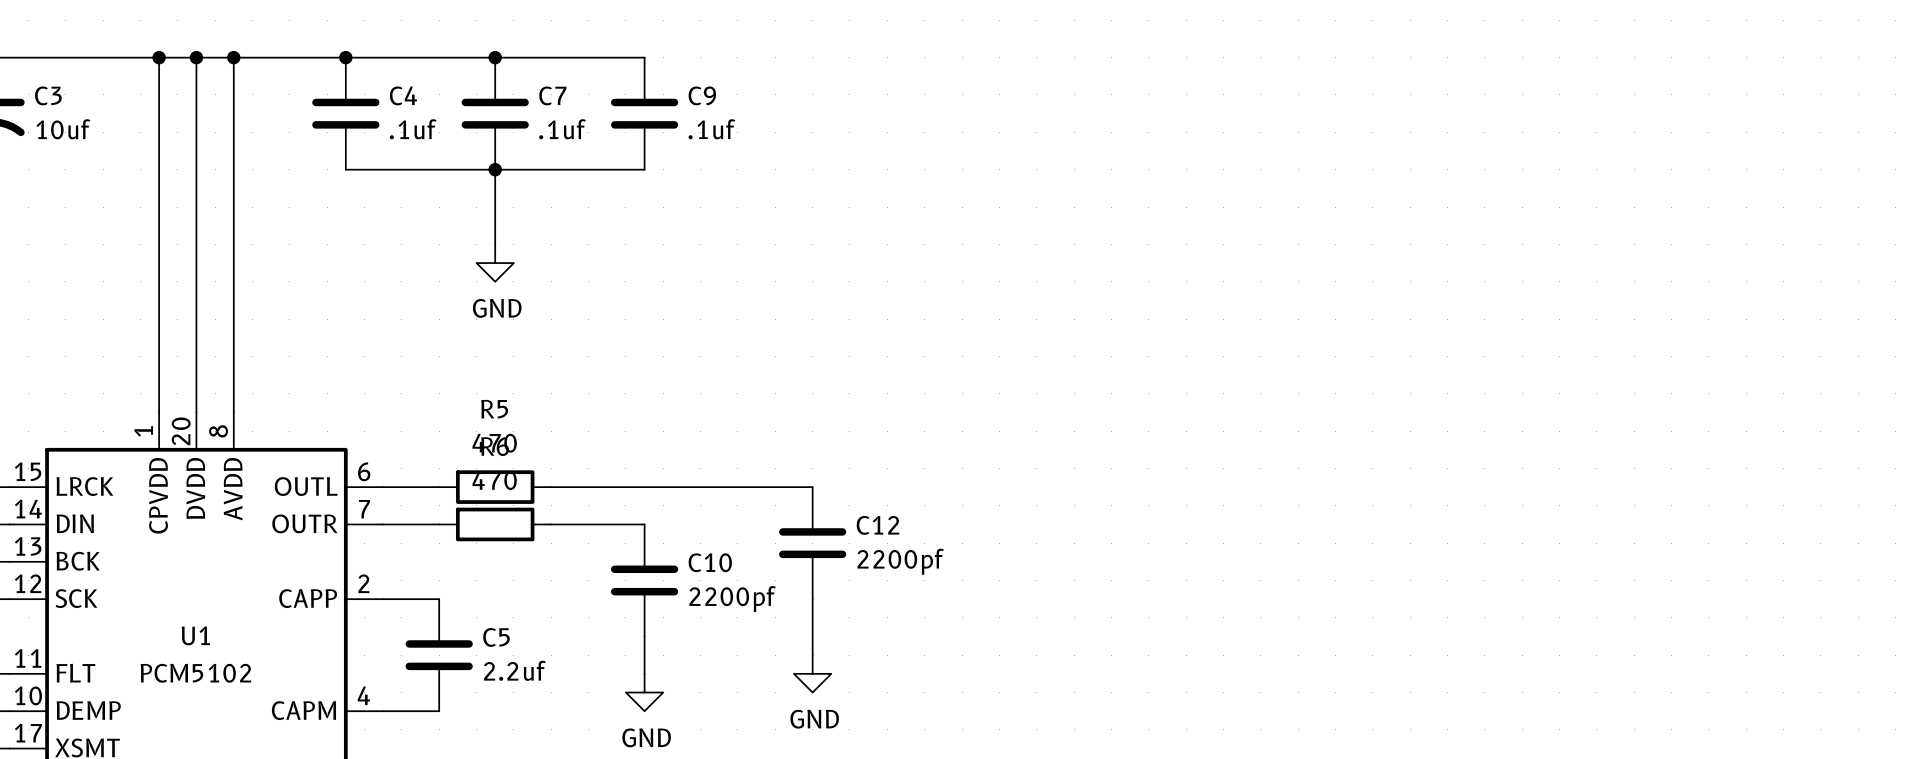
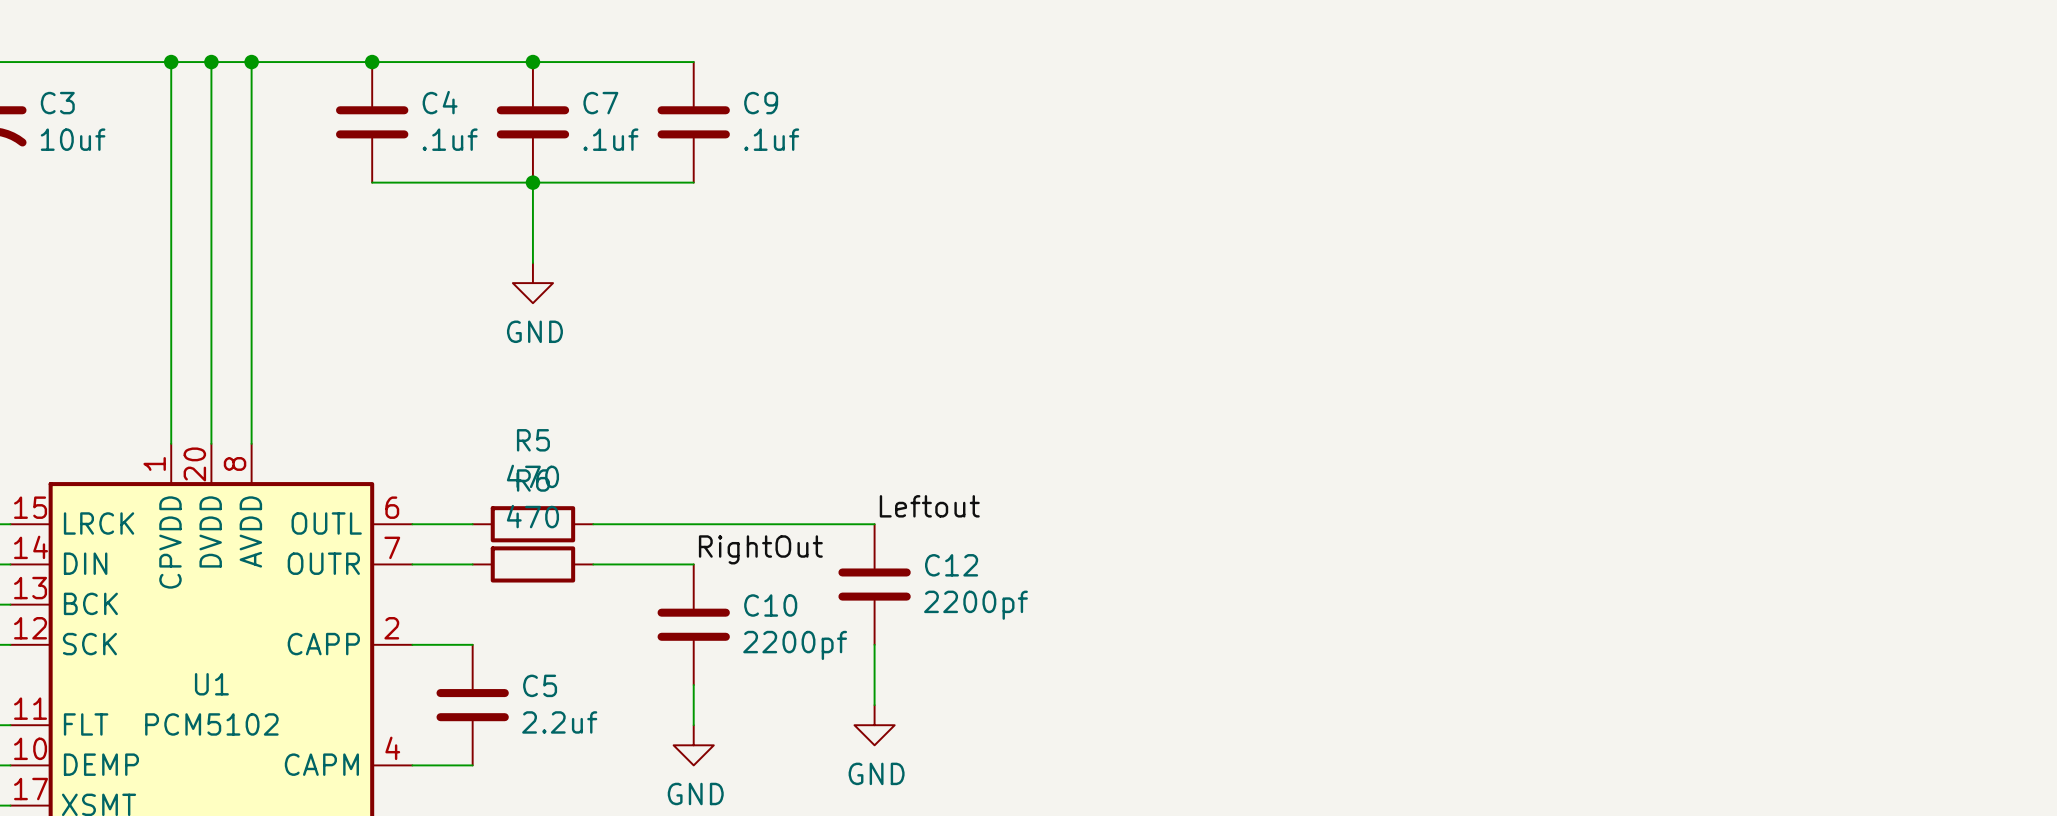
label: none -> Leftout (929, 506)
label: none -> RightOut (760, 549)

